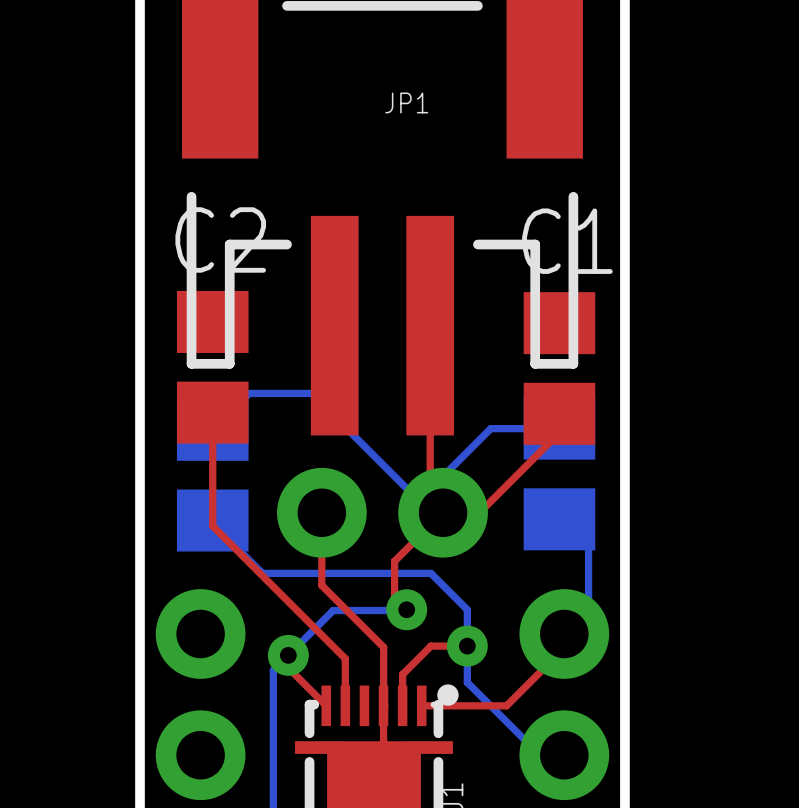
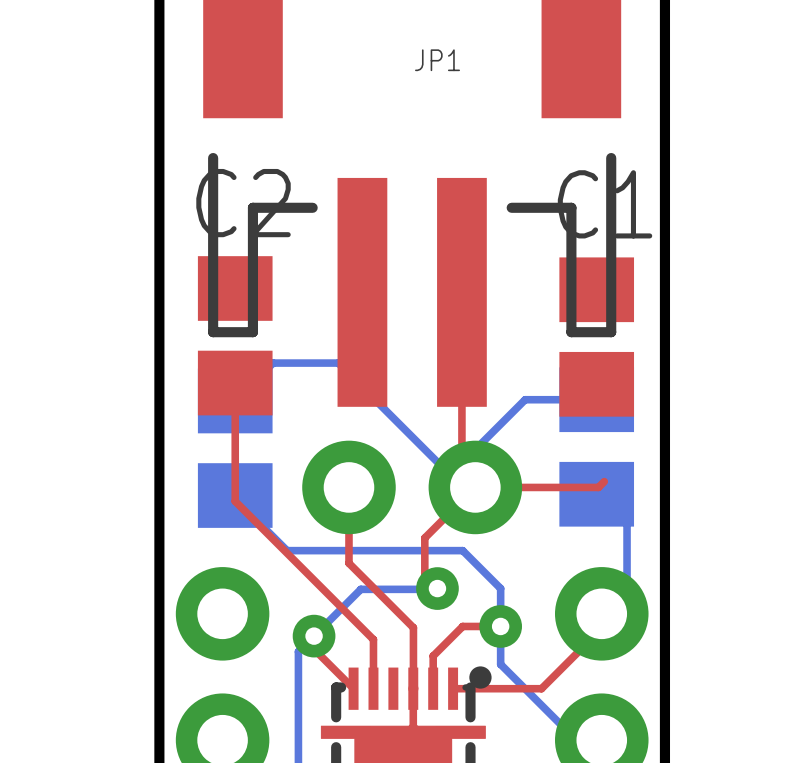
top track: (559, 413) (559, 432) (479, 512) -> (604, 481) (598, 487) (513, 487)

